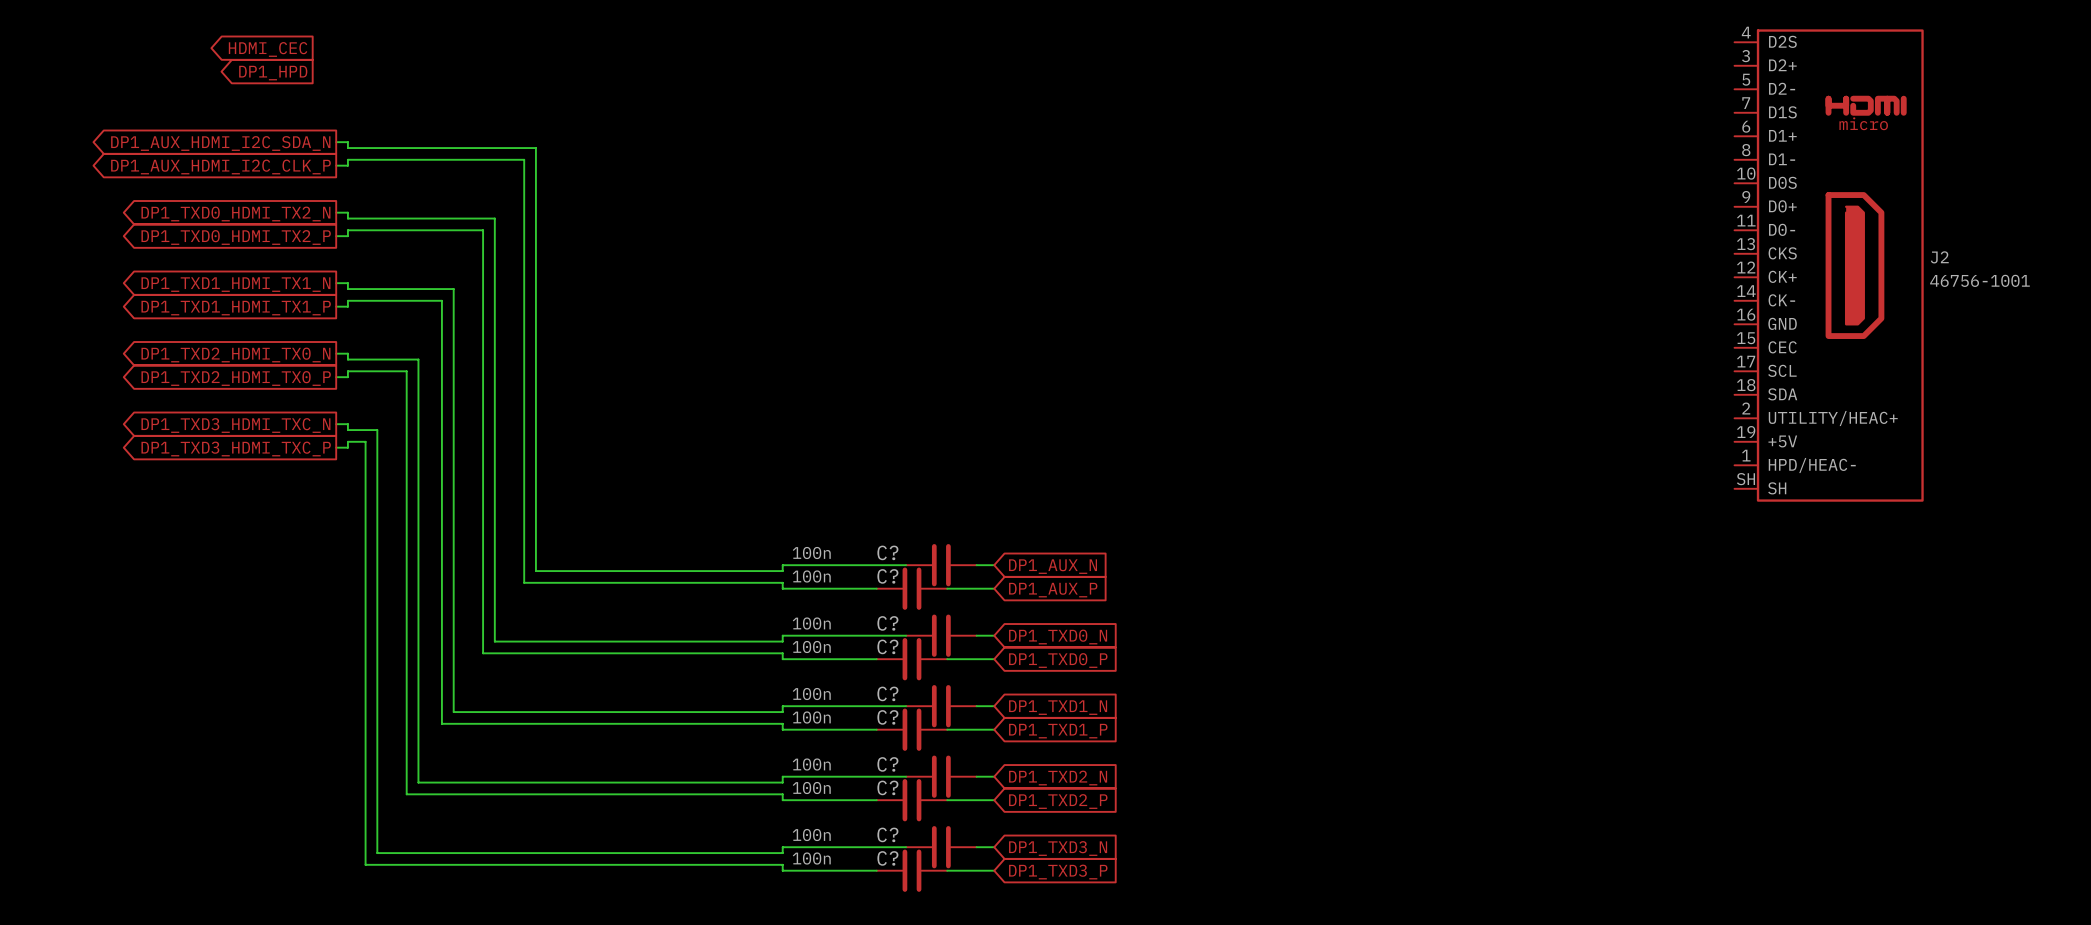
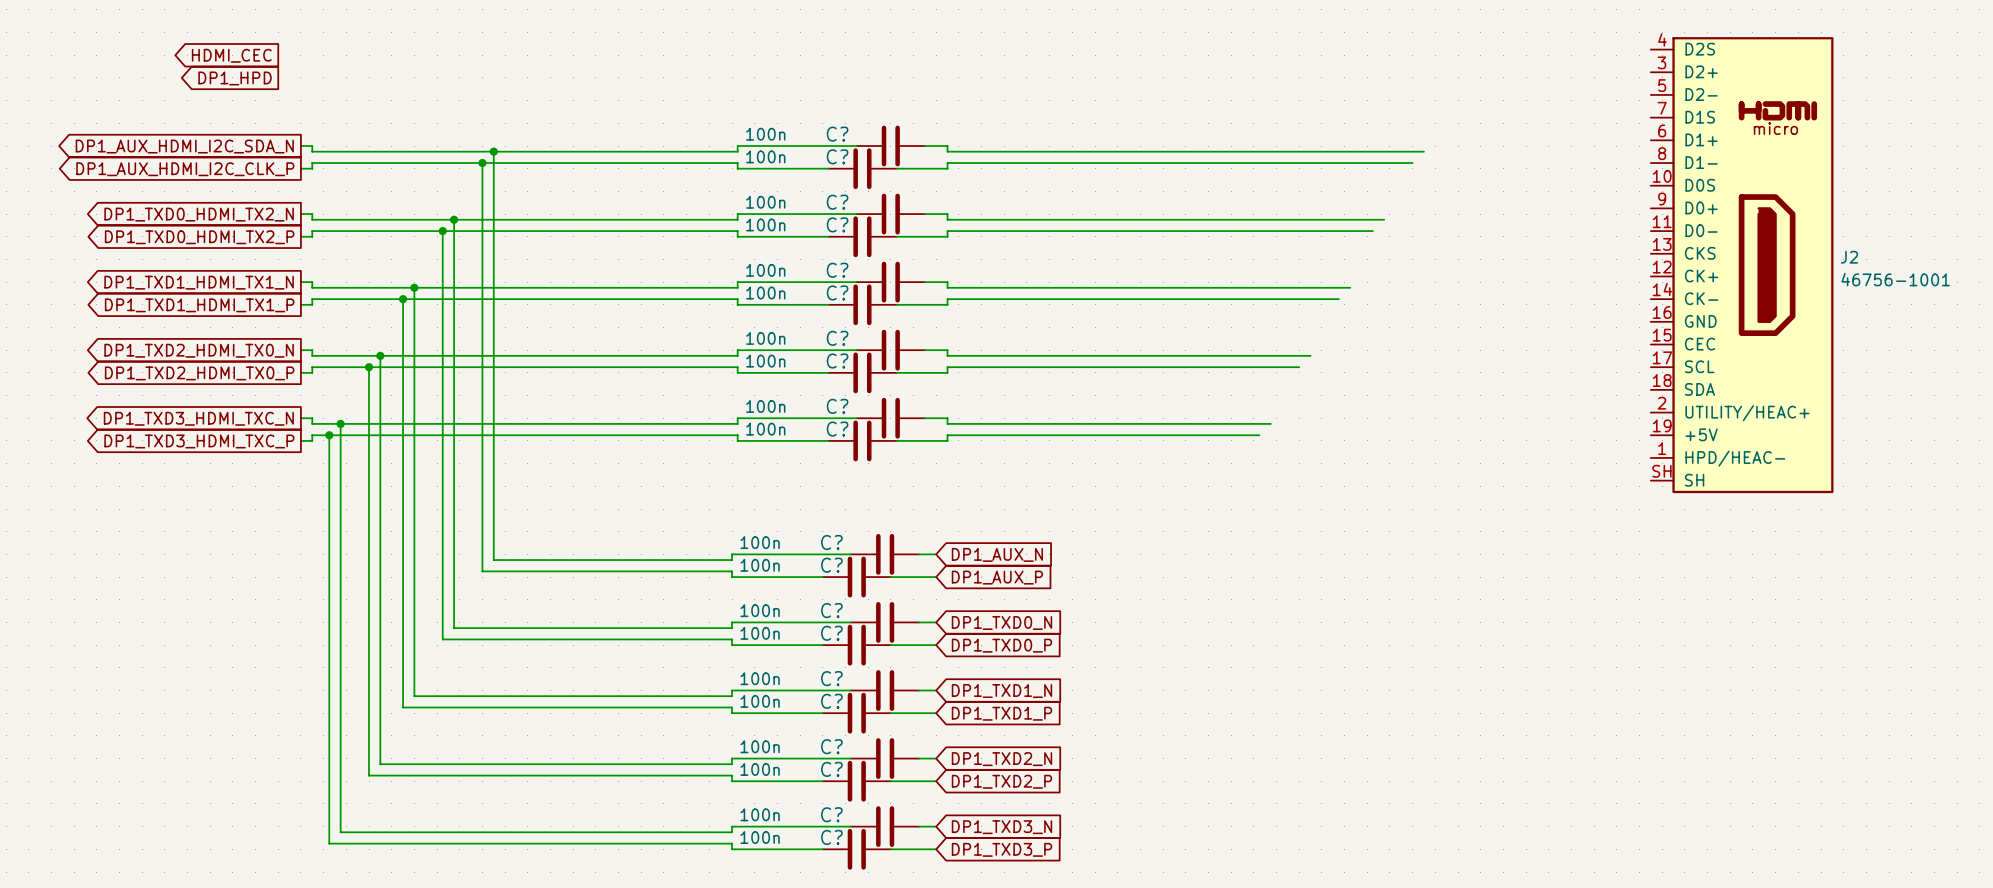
wire: none -> (856, 146) (737, 146) (737, 151) (493, 151)
C?: none -> (890, 146)
wire: none -> (924, 146) (947, 146) (947, 151) (1423, 151)
junction: none -> (493, 151)
wire: none -> (482, 163) (737, 163) (737, 168) (828, 168)
junction: none -> (482, 163)
wire: none -> (1412, 163) (947, 163) (947, 168) (896, 168)
C?: none -> (862, 168)
wire: none -> (856, 214) (737, 214) (737, 219) (454, 219)
C?: none -> (890, 214)
wire: none -> (924, 214) (947, 214) (947, 219) (1384, 219)
junction: none -> (454, 219)
wire: none -> (442, 231) (737, 231) (737, 236) (828, 236)
junction: none -> (442, 231)
wire: none -> (1372, 231) (947, 231) (947, 236) (896, 236)
C?: none -> (862, 236)
wire: none -> (856, 282) (737, 282) (737, 287) (414, 287)
C?: none -> (890, 282)
wire: none -> (924, 282) (947, 282) (947, 287) (1350, 287)
junction: none -> (414, 287)
wire: none -> (403, 299) (737, 299) (737, 304) (828, 304)
junction: none -> (403, 299)
wire: none -> (1338, 299) (947, 299) (947, 304) (896, 304)
C?: none -> (862, 304)
wire: none -> (856, 350) (737, 350) (737, 355) (380, 355)
C?: none -> (890, 350)
wire: none -> (924, 350) (947, 350) (947, 355) (1310, 355)
junction: none -> (380, 355)
wire: none -> (369, 367) (737, 367) (737, 372) (828, 372)
junction: none -> (369, 367)
wire: none -> (1299, 367) (947, 367) (947, 372) (896, 372)
C?: none -> (862, 372)
wire: none -> (856, 418) (737, 418) (737, 423) (340, 423)
C?: none -> (890, 418)
wire: none -> (924, 418) (947, 418) (947, 423) (1270, 423)
junction: none -> (340, 423)
wire: none -> (329, 435) (737, 435) (737, 440) (828, 440)
junction: none -> (329, 435)
wire: none -> (1259, 435) (947, 435) (947, 440) (896, 440)
C?: none -> (862, 440)

